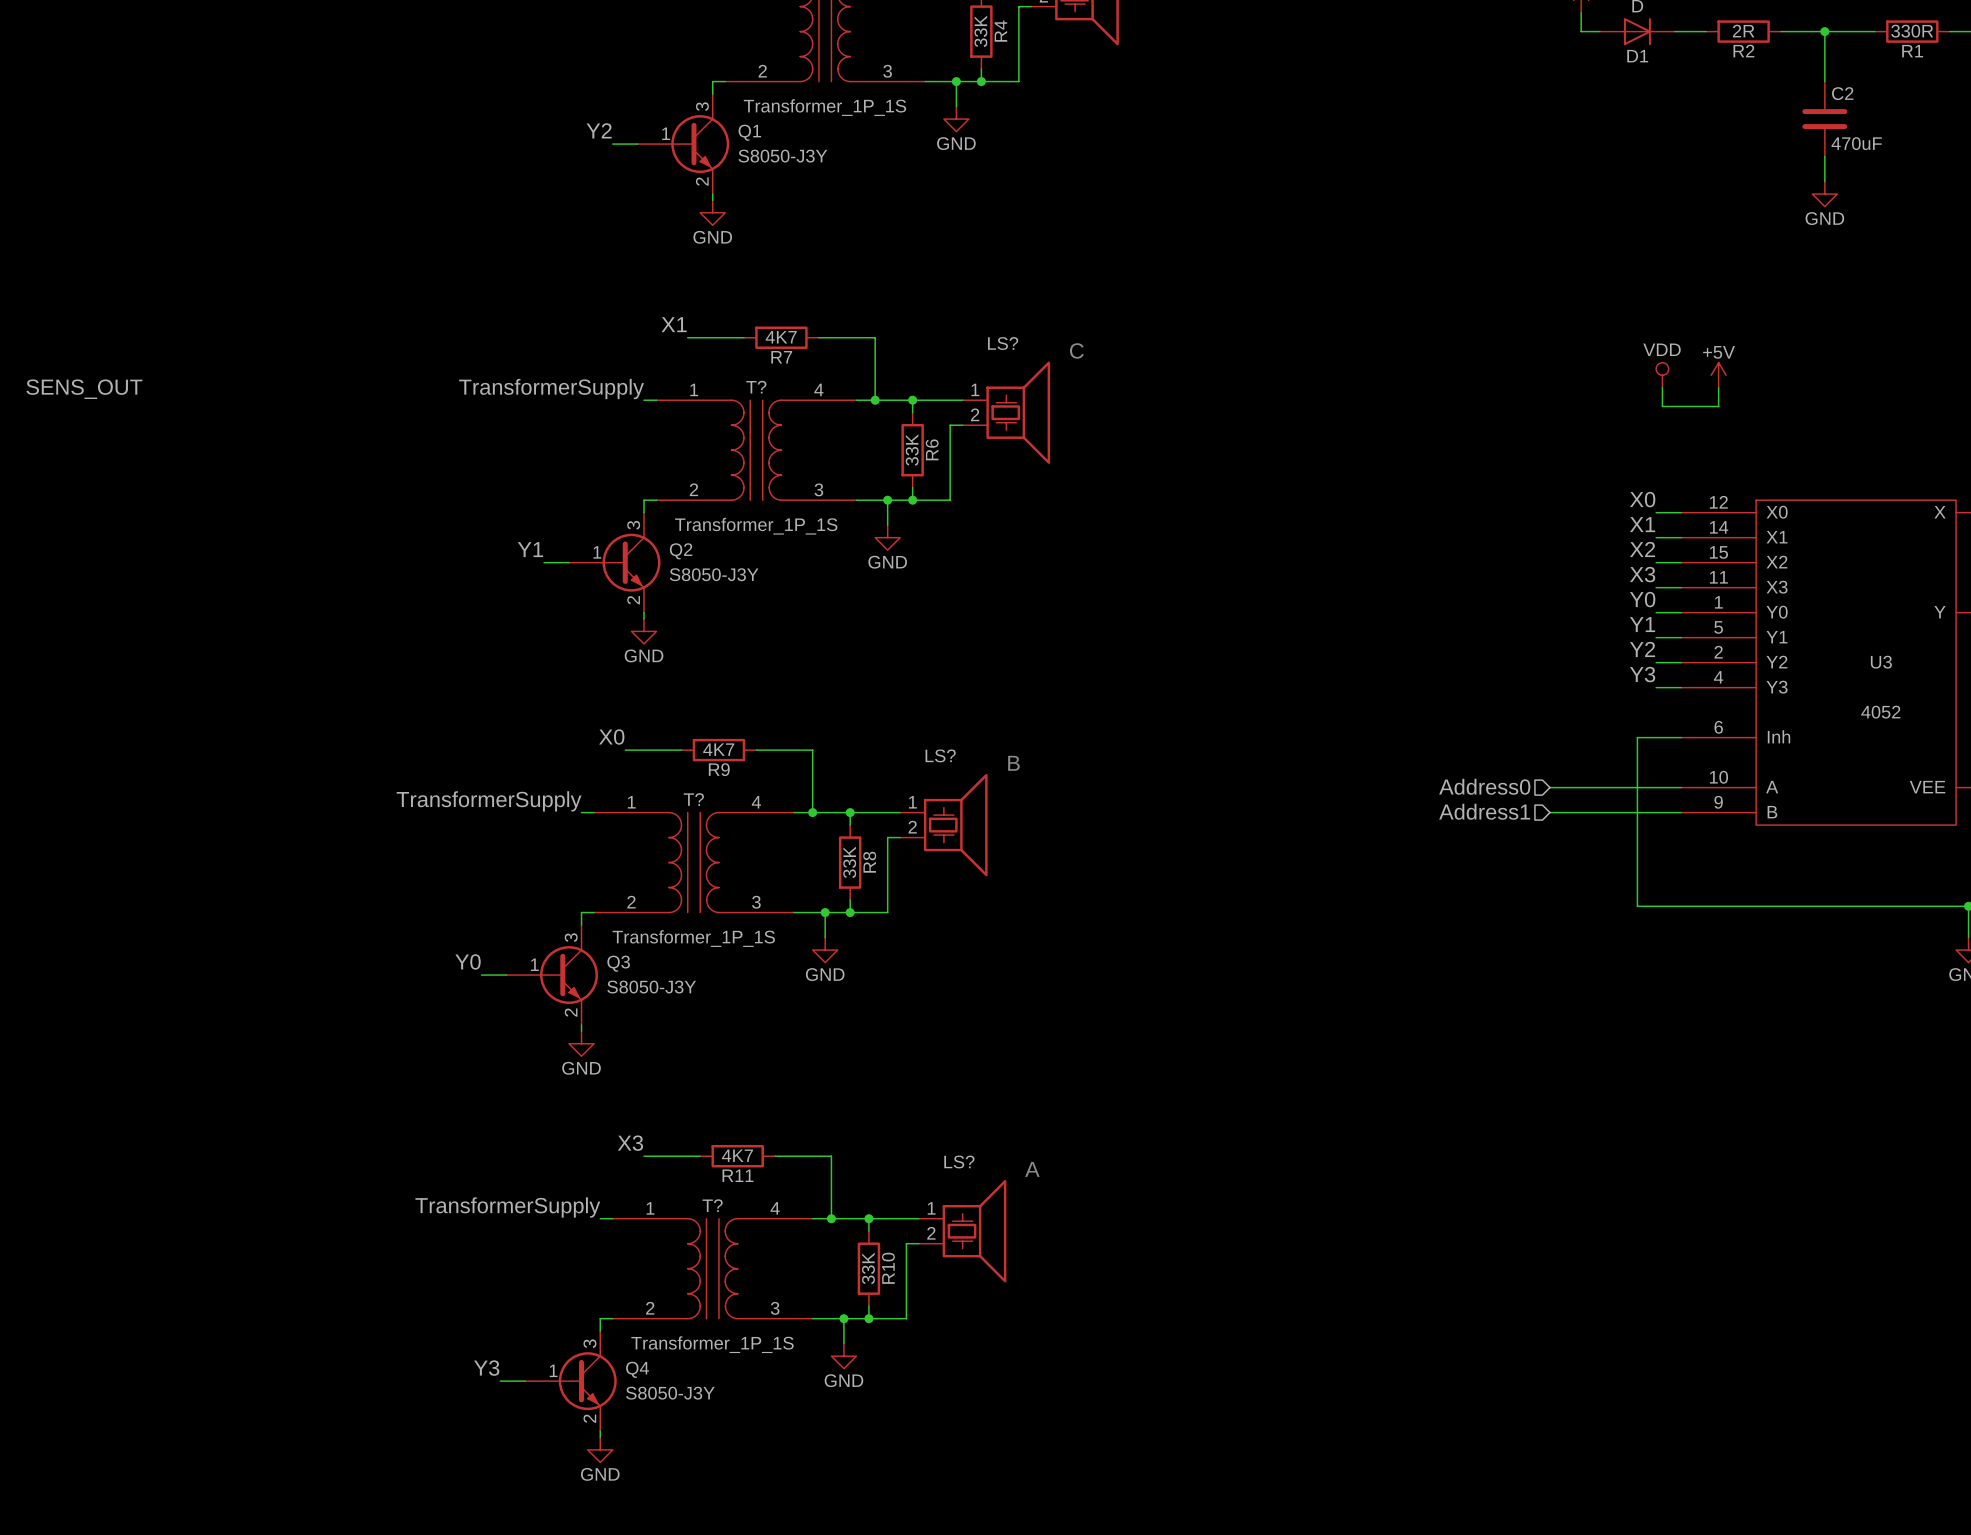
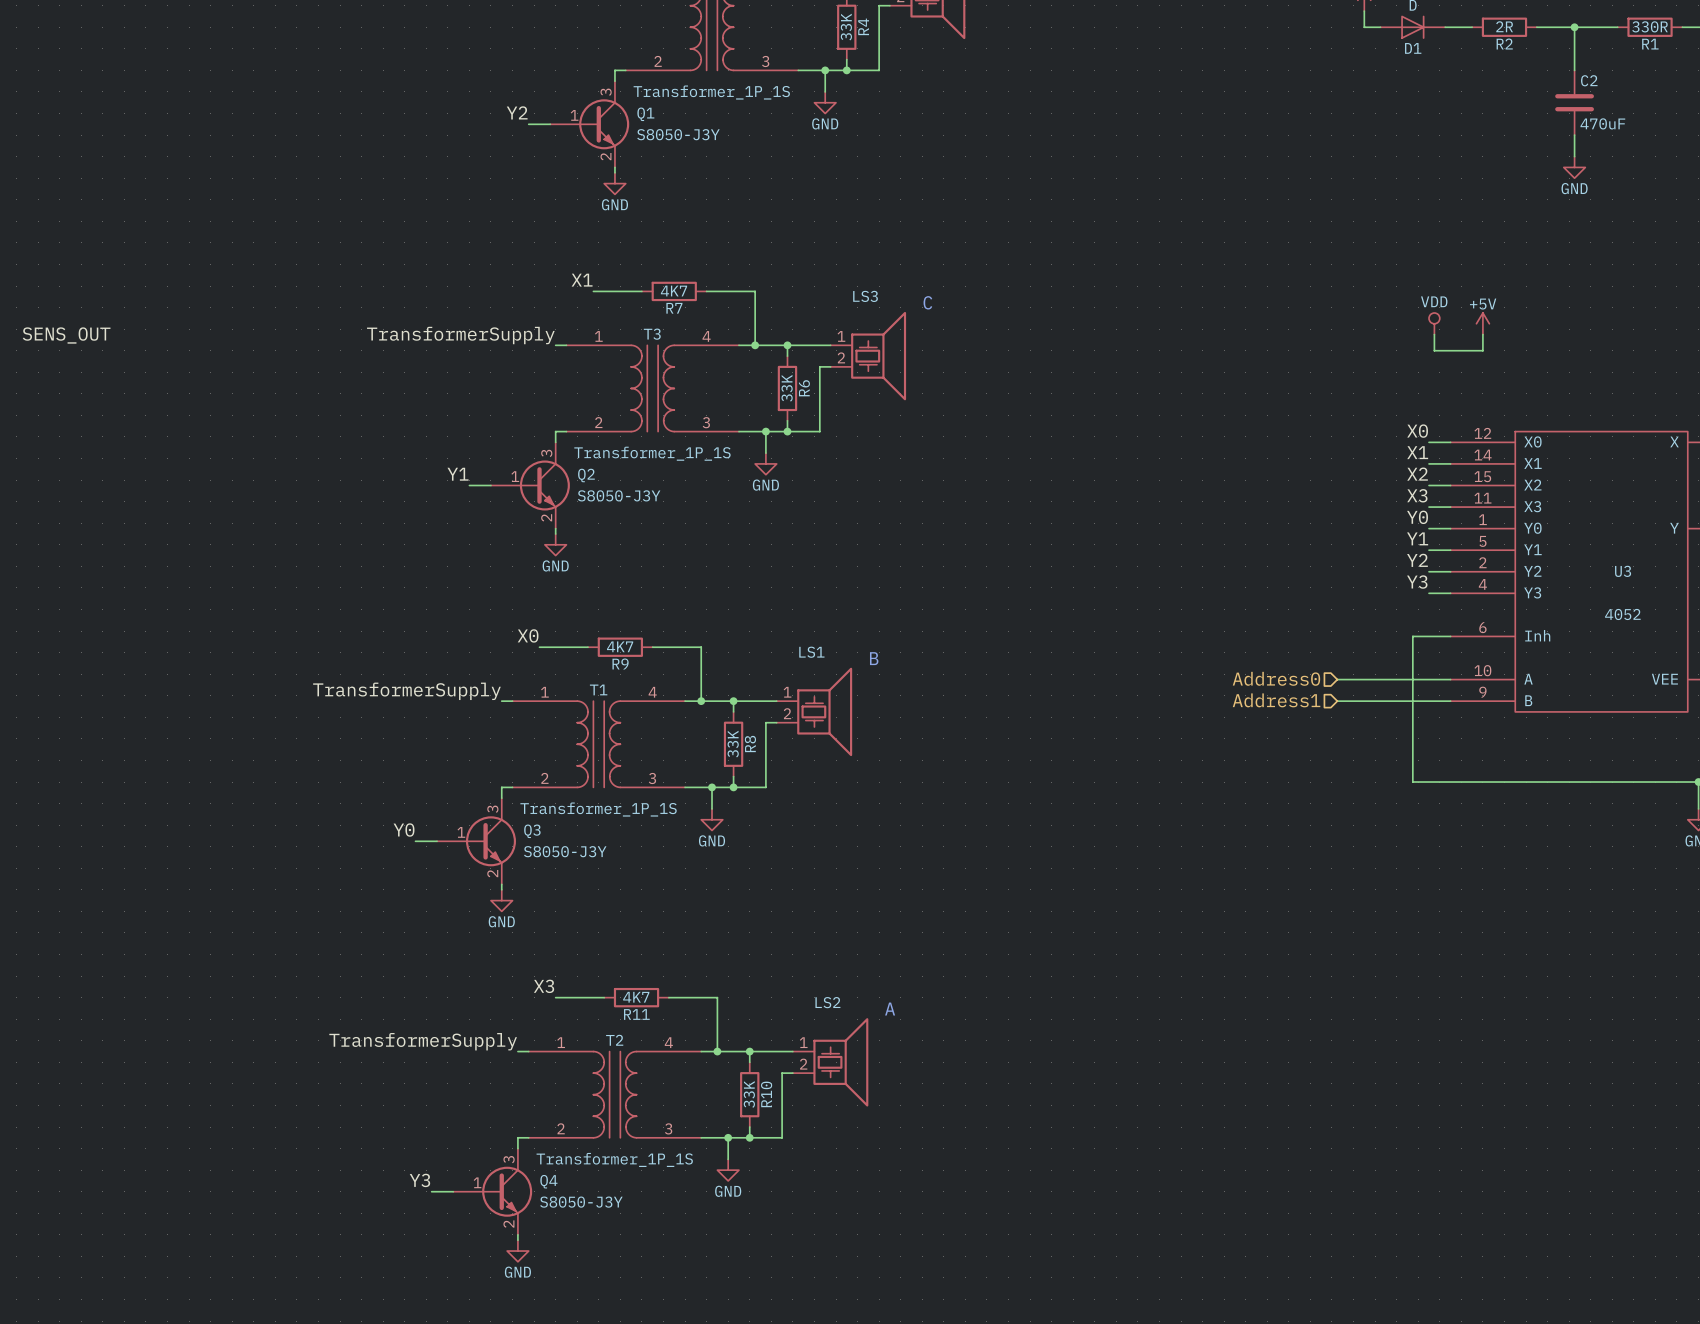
LS? name: LS? (1003, 343) -> LS3 (865, 296)
T? name: T? (756, 387) -> T3 (652, 334)
LS? name: LS? (940, 755) -> LS1 (811, 652)
T? name: T? (693, 799) -> T1 (598, 689)
LS? name: LS? (959, 1162) -> LS2 (827, 1002)
T? name: T? (712, 1205) -> T2 (614, 1040)

